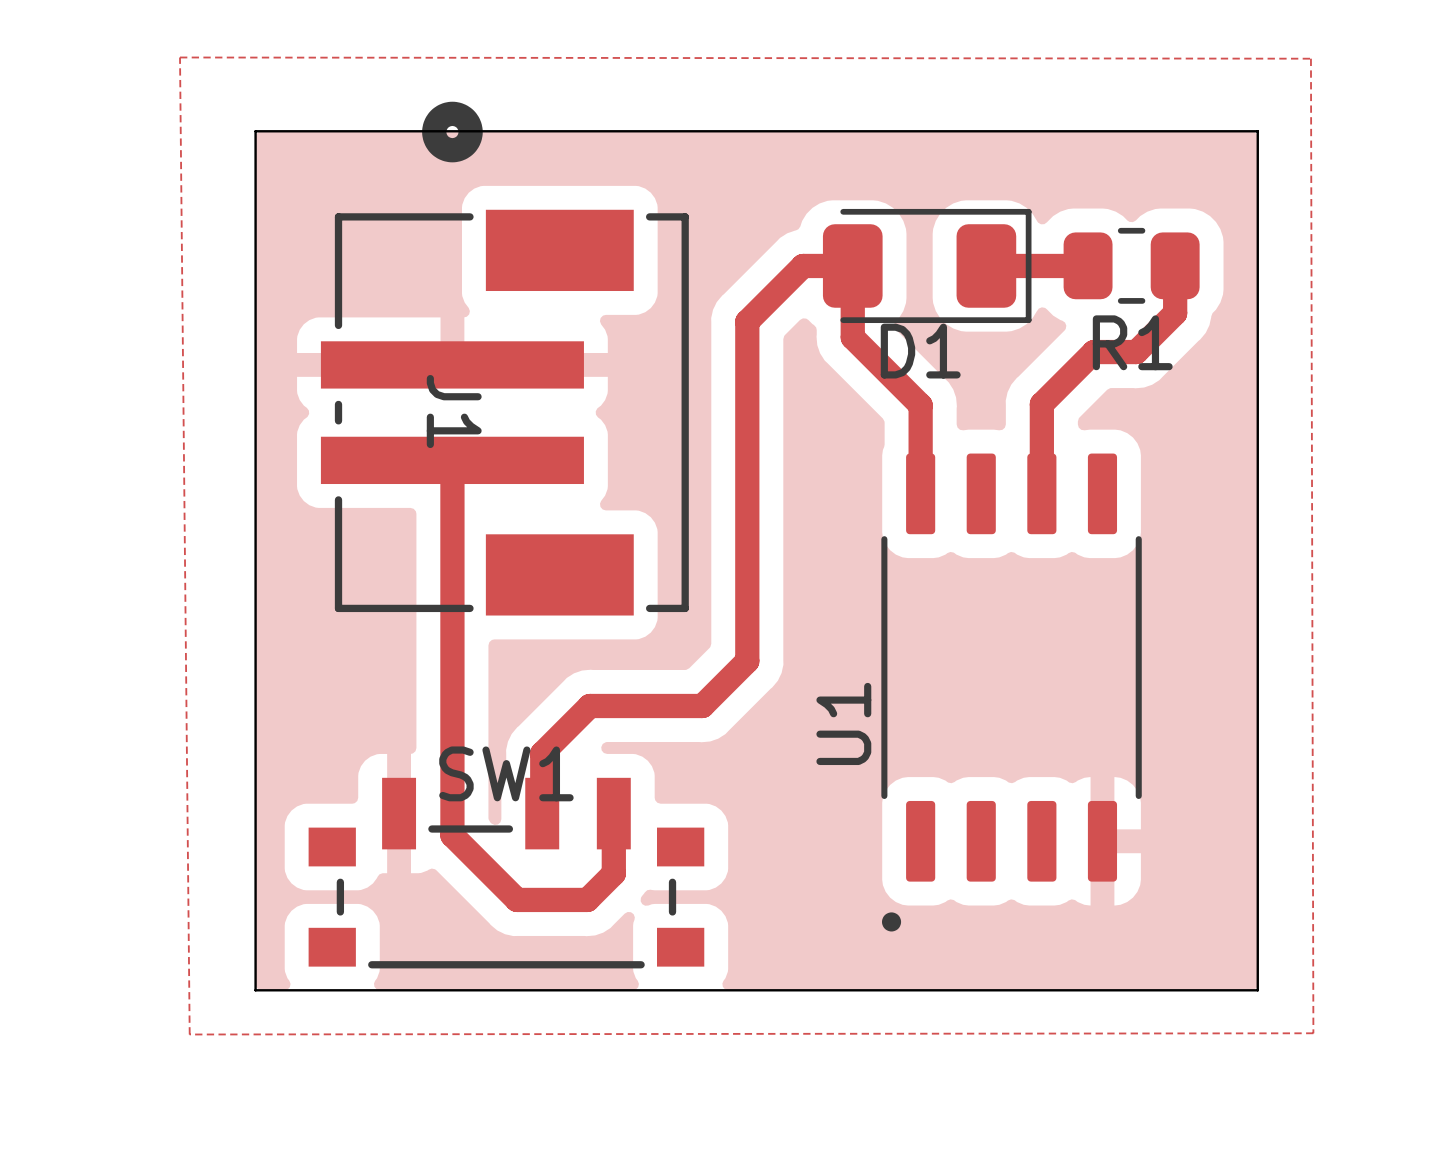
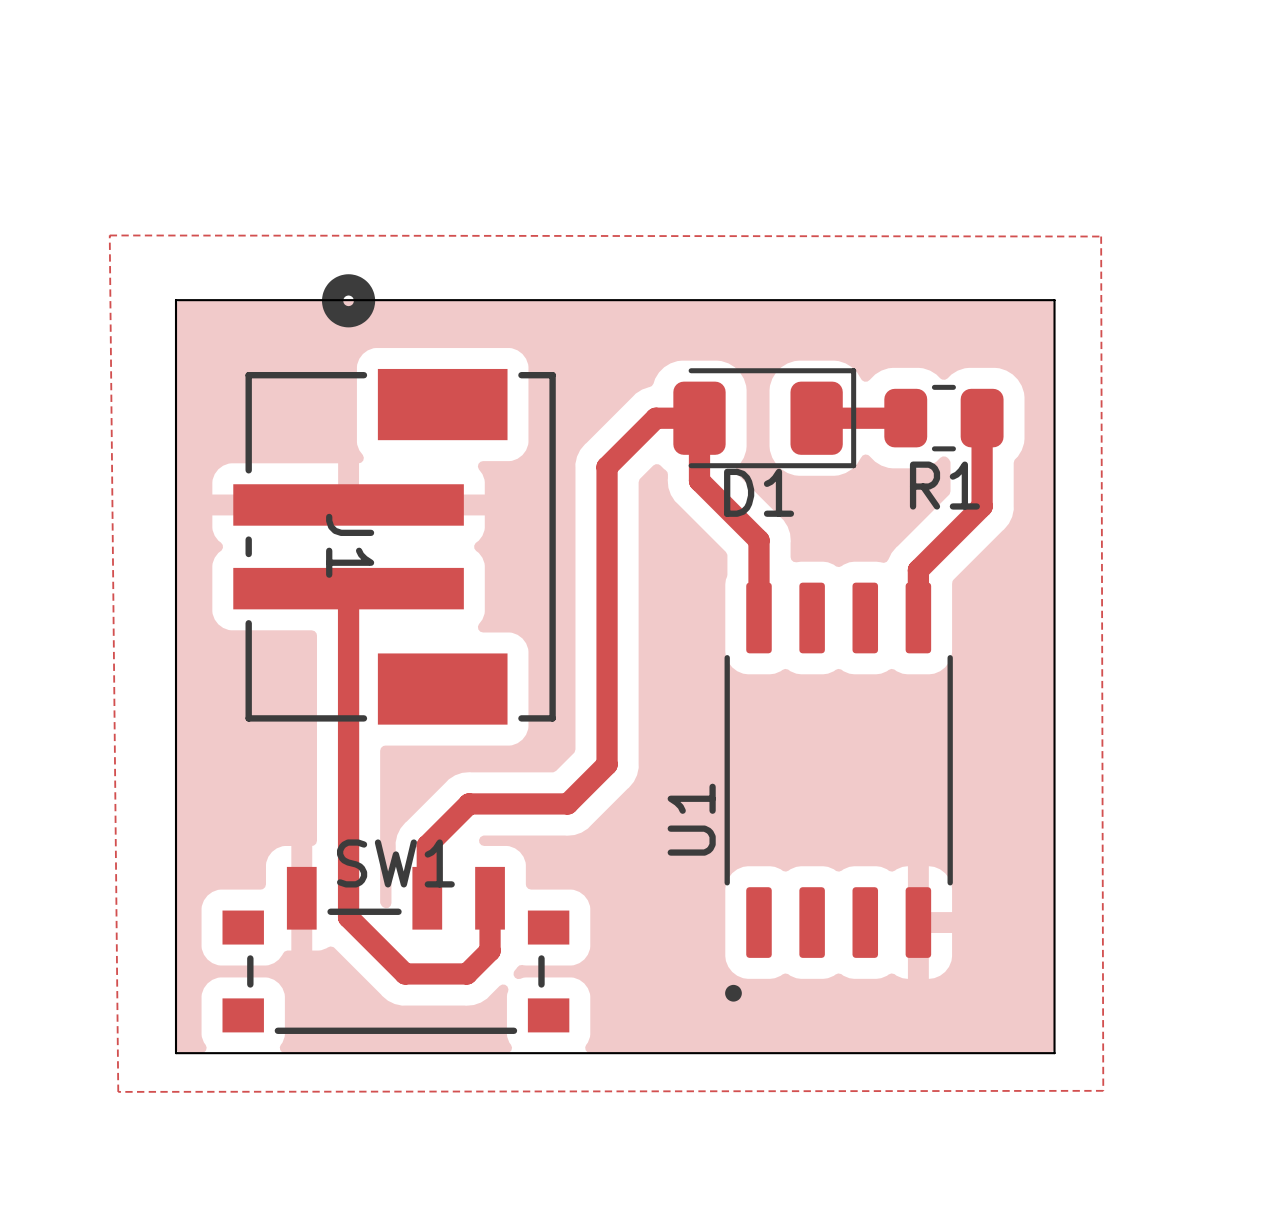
track: (1175, 313) (1136, 352) (1093, 352) (1041, 404) (1041, 493) -> (982, 459) (982, 506) (918, 570) (918, 617)

